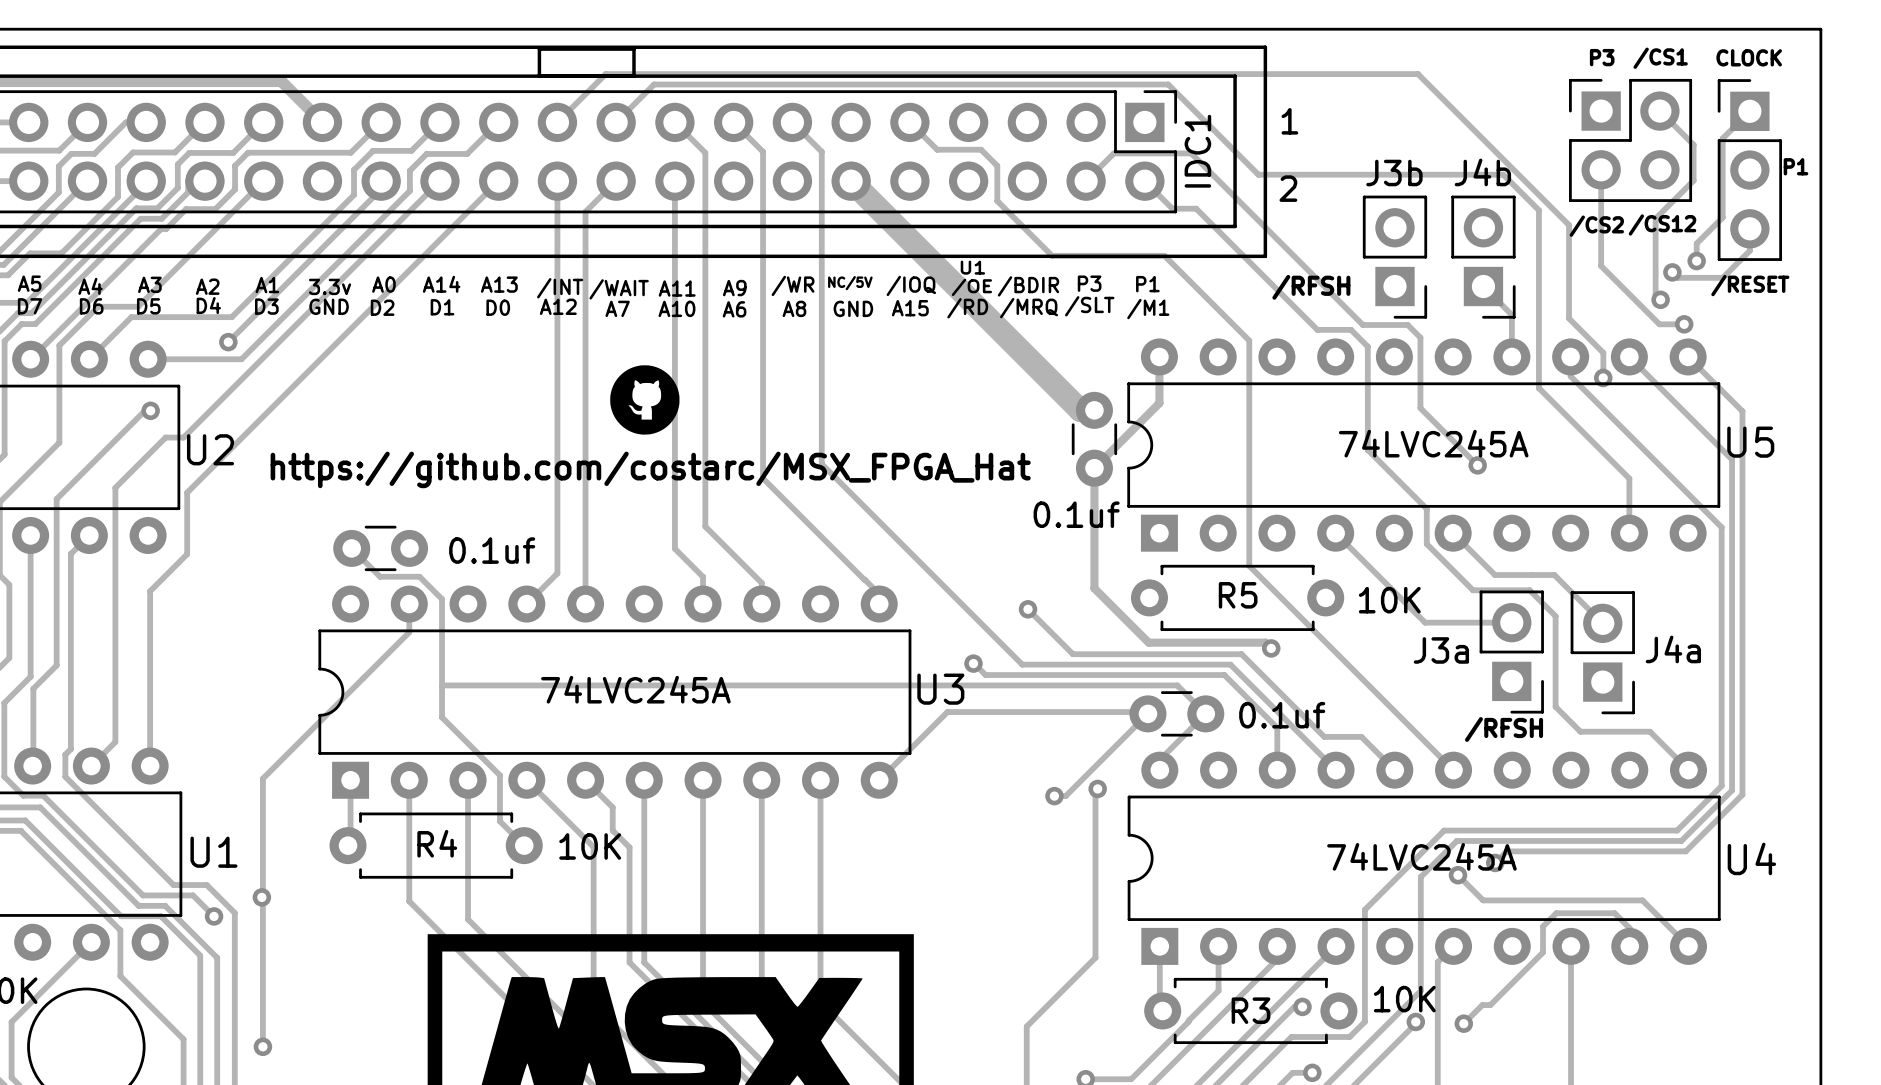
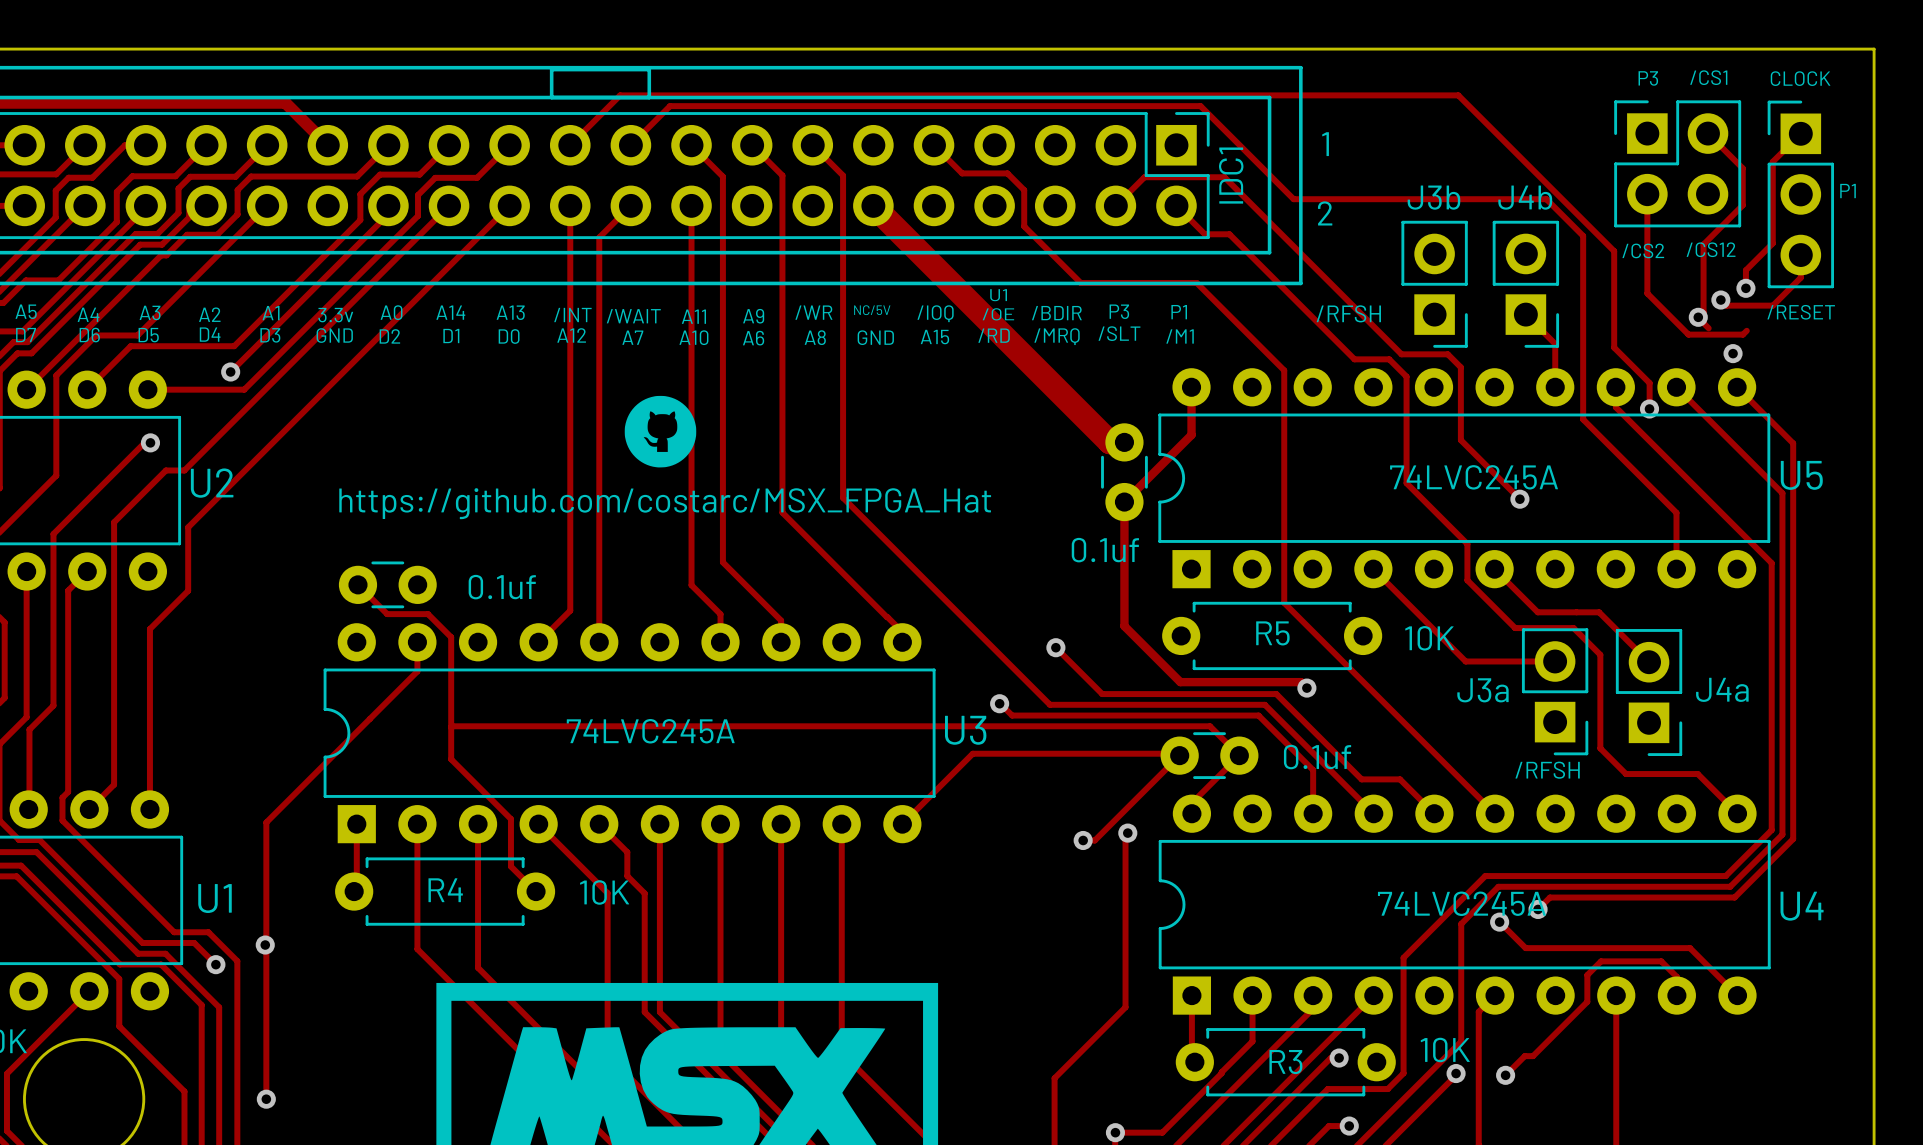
via position: (1660, 299) -> (1698, 317)
track: (1641, 305) (1659, 324) (1684, 324) -> (1688, 334) (1742, 334) (1746, 330)

